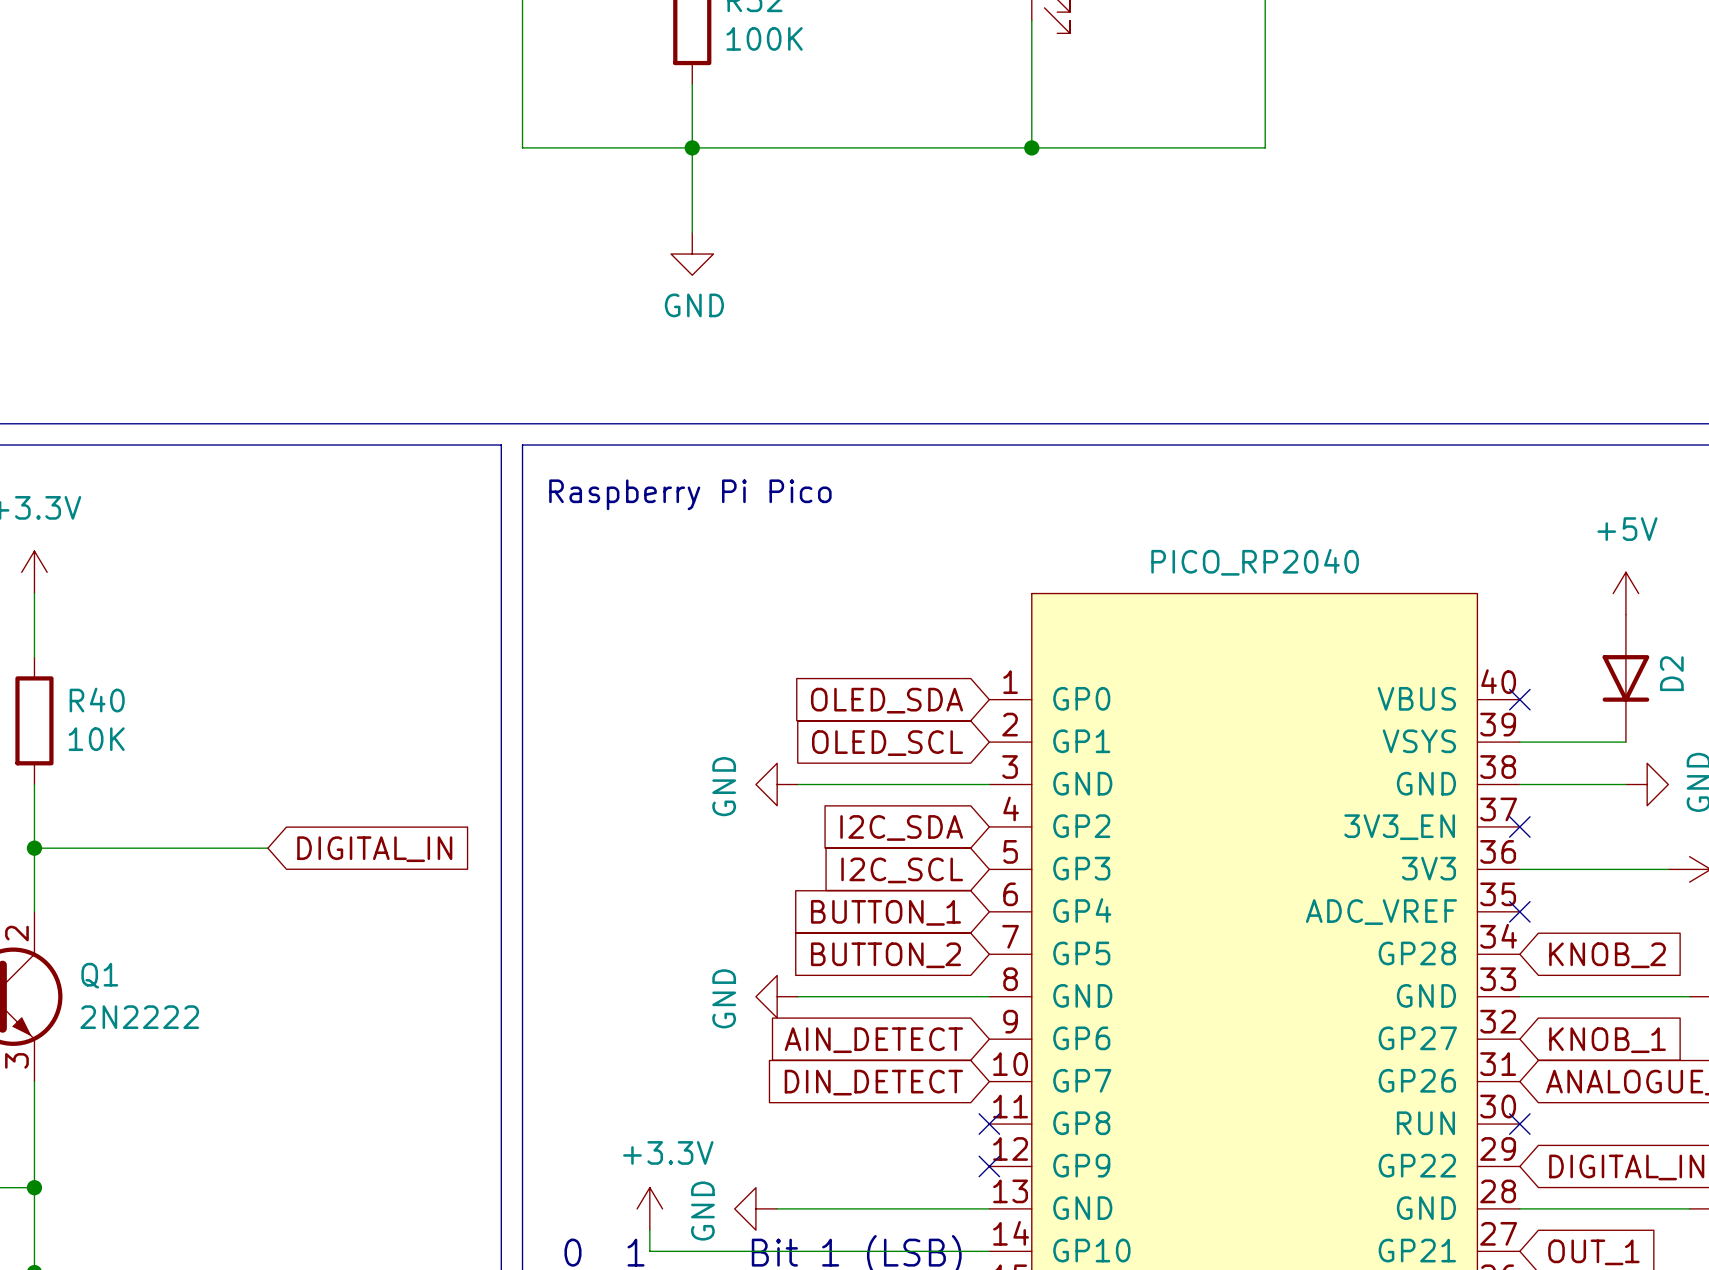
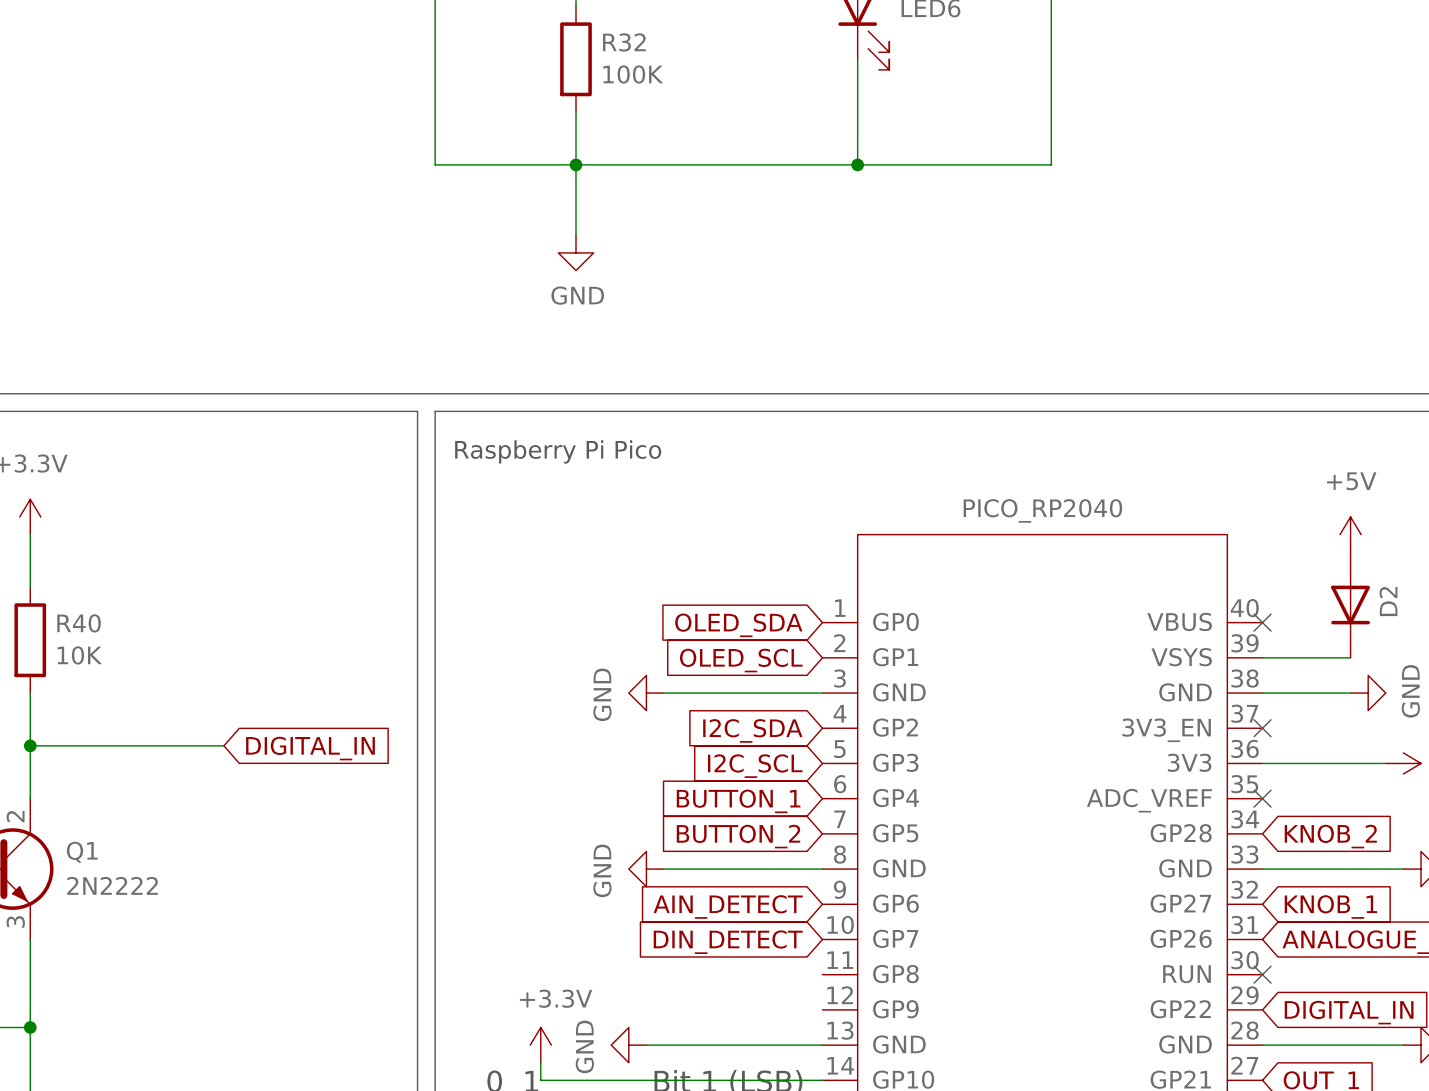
no-connect mark: (989, 1124) -> none
no-connect mark: (989, 1166) -> none

